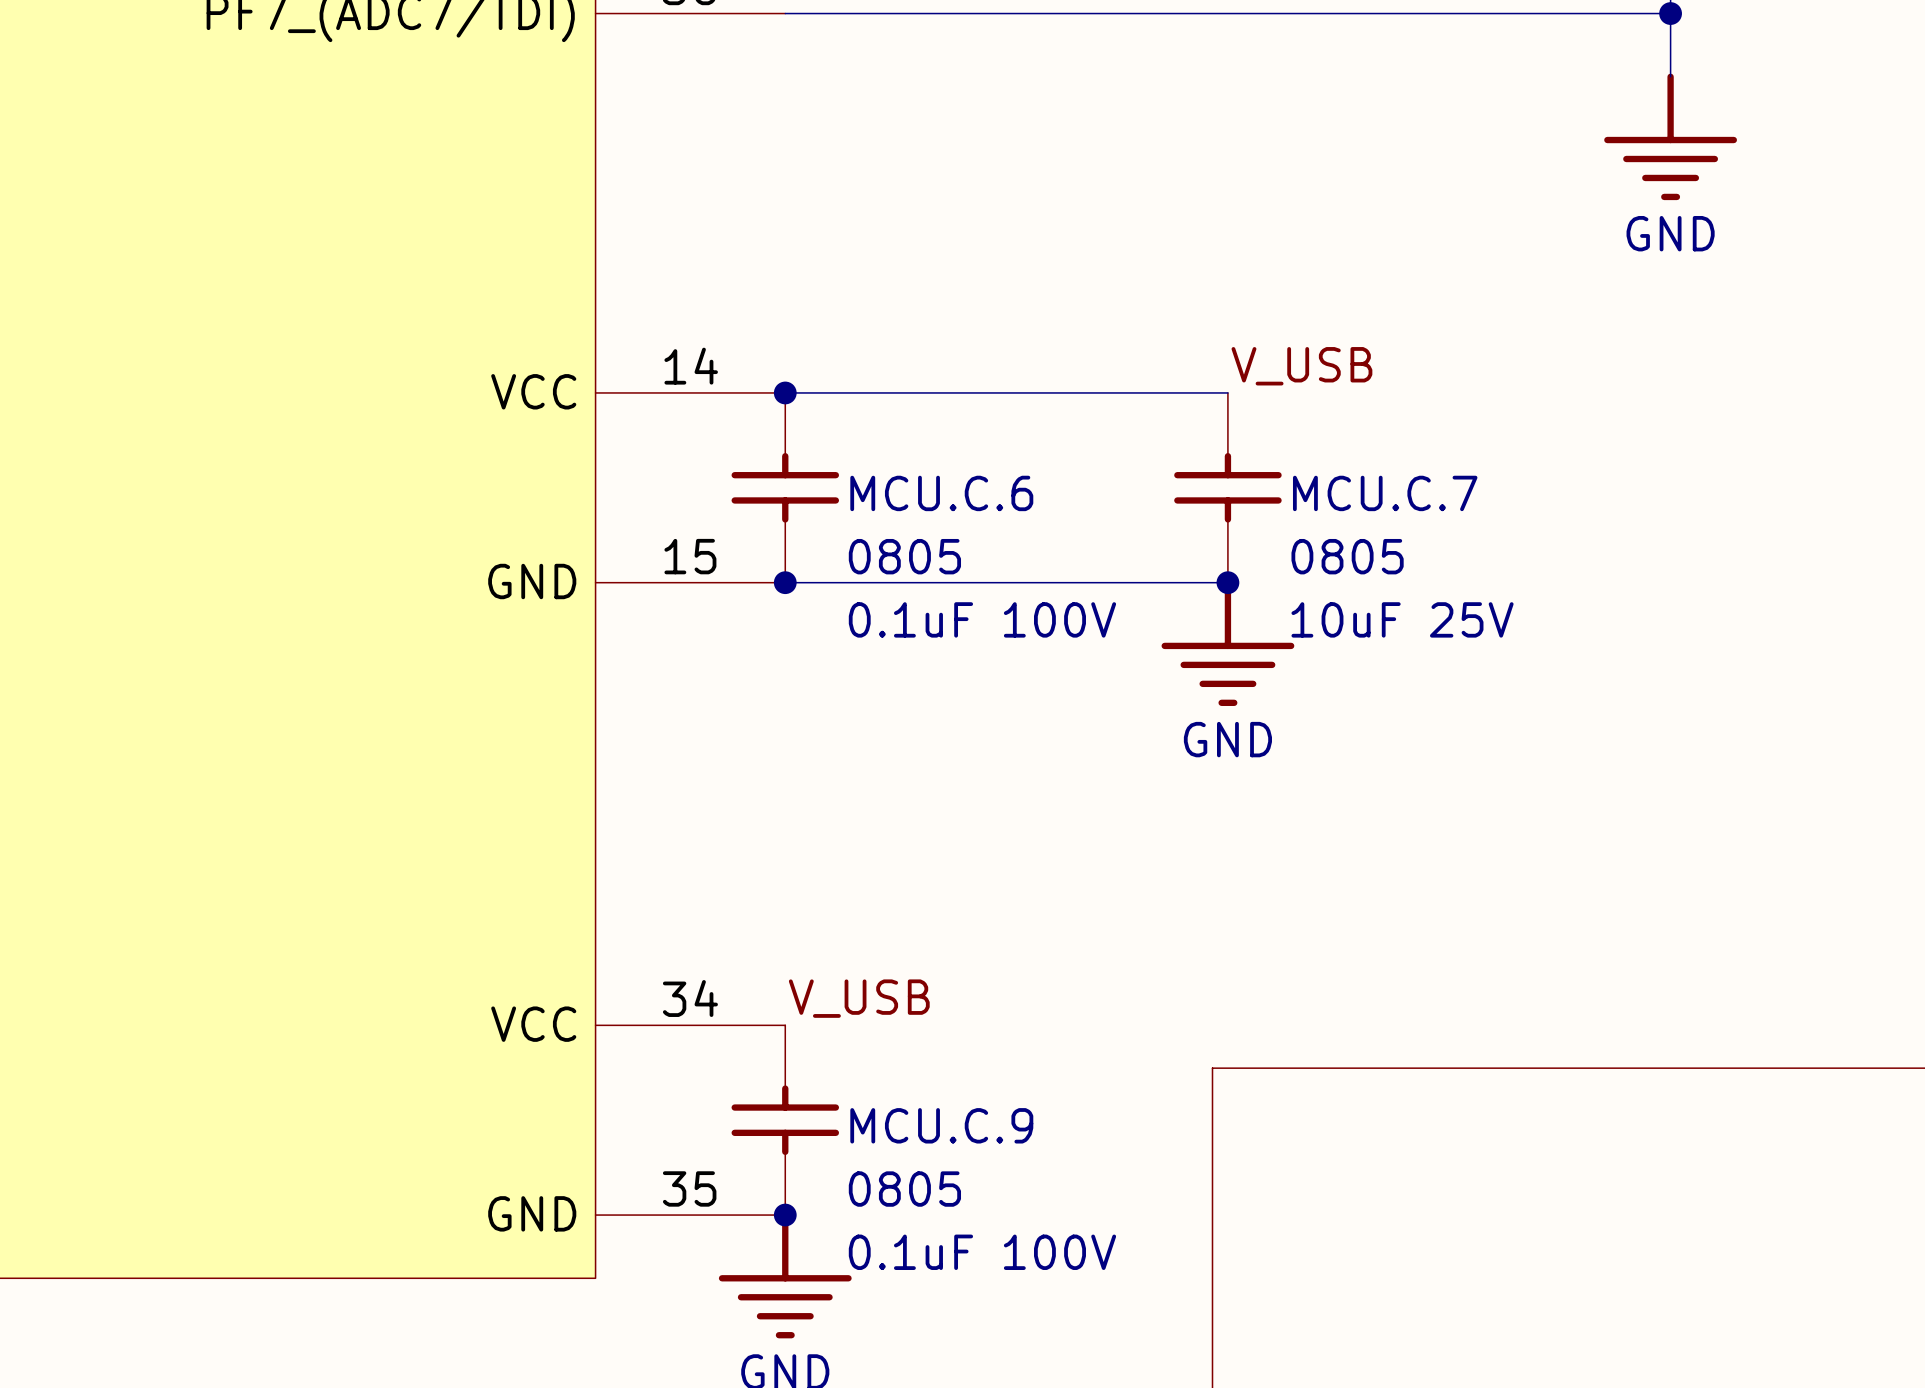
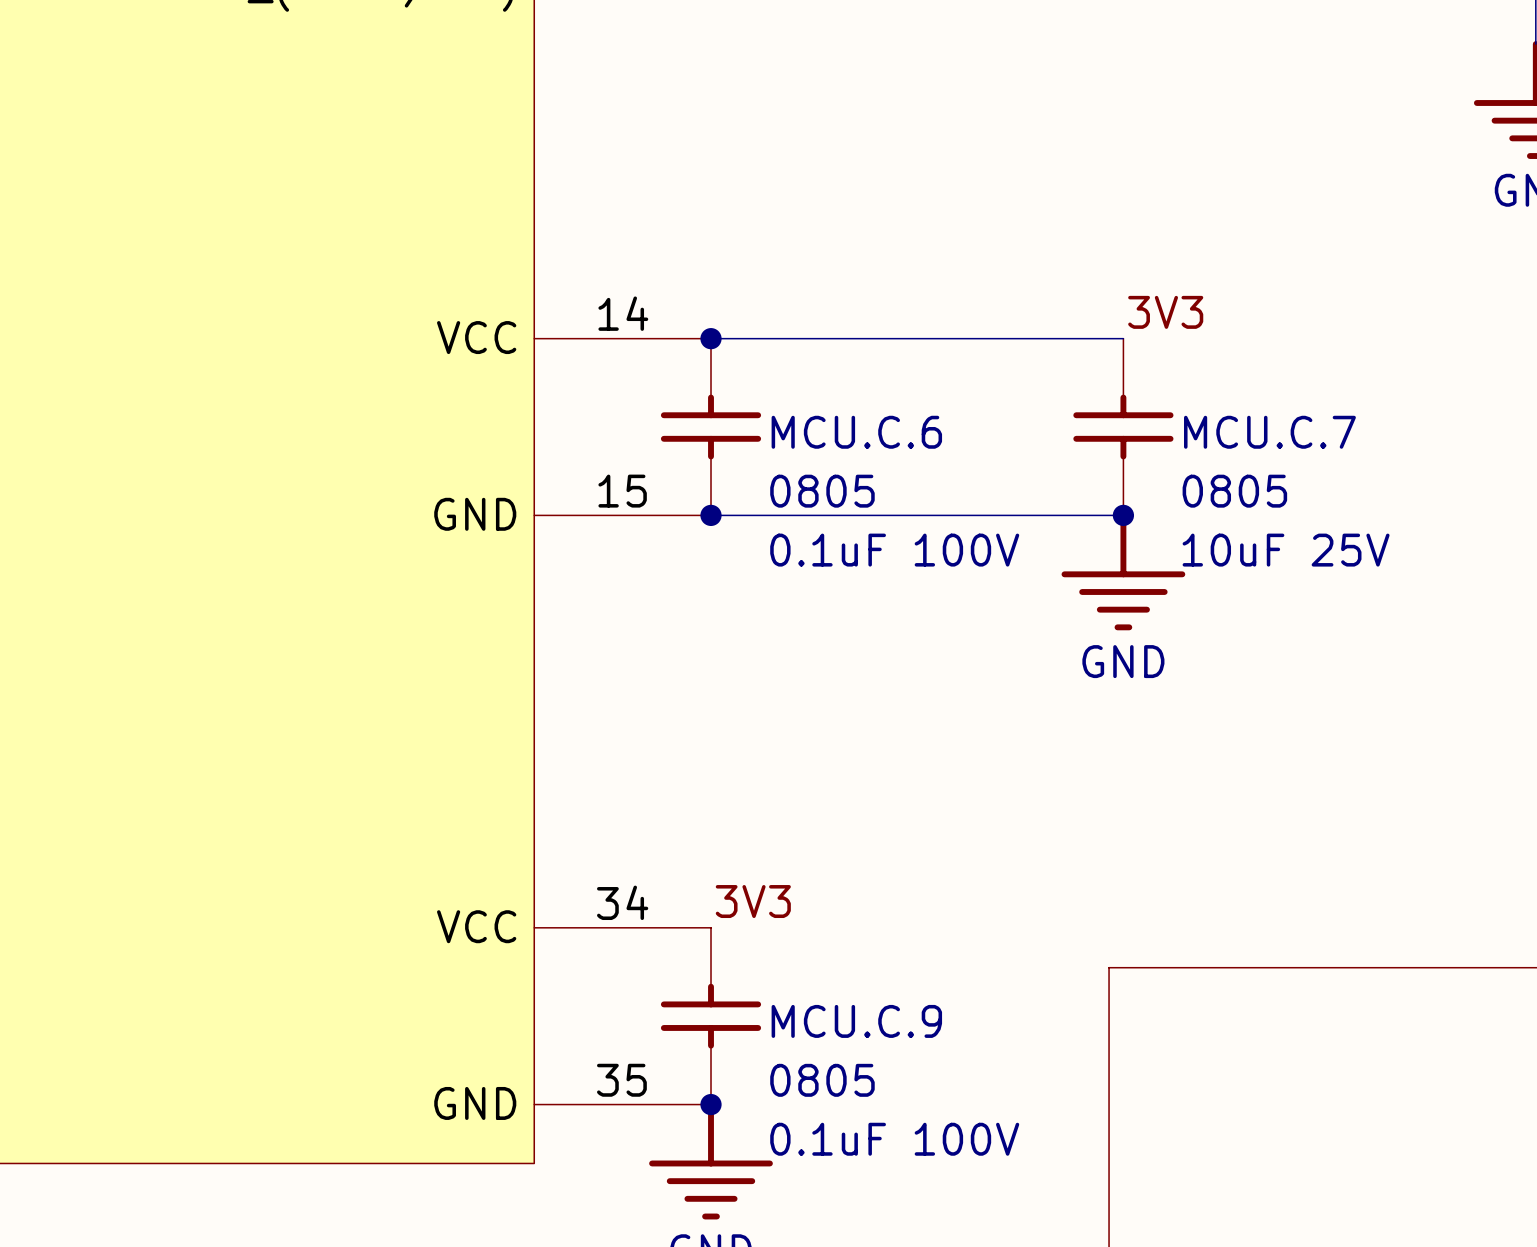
label: V_USB (1301, 366) -> 3V3 (1165, 312)
label: V_USB (859, 998) -> 3V3 (753, 901)

